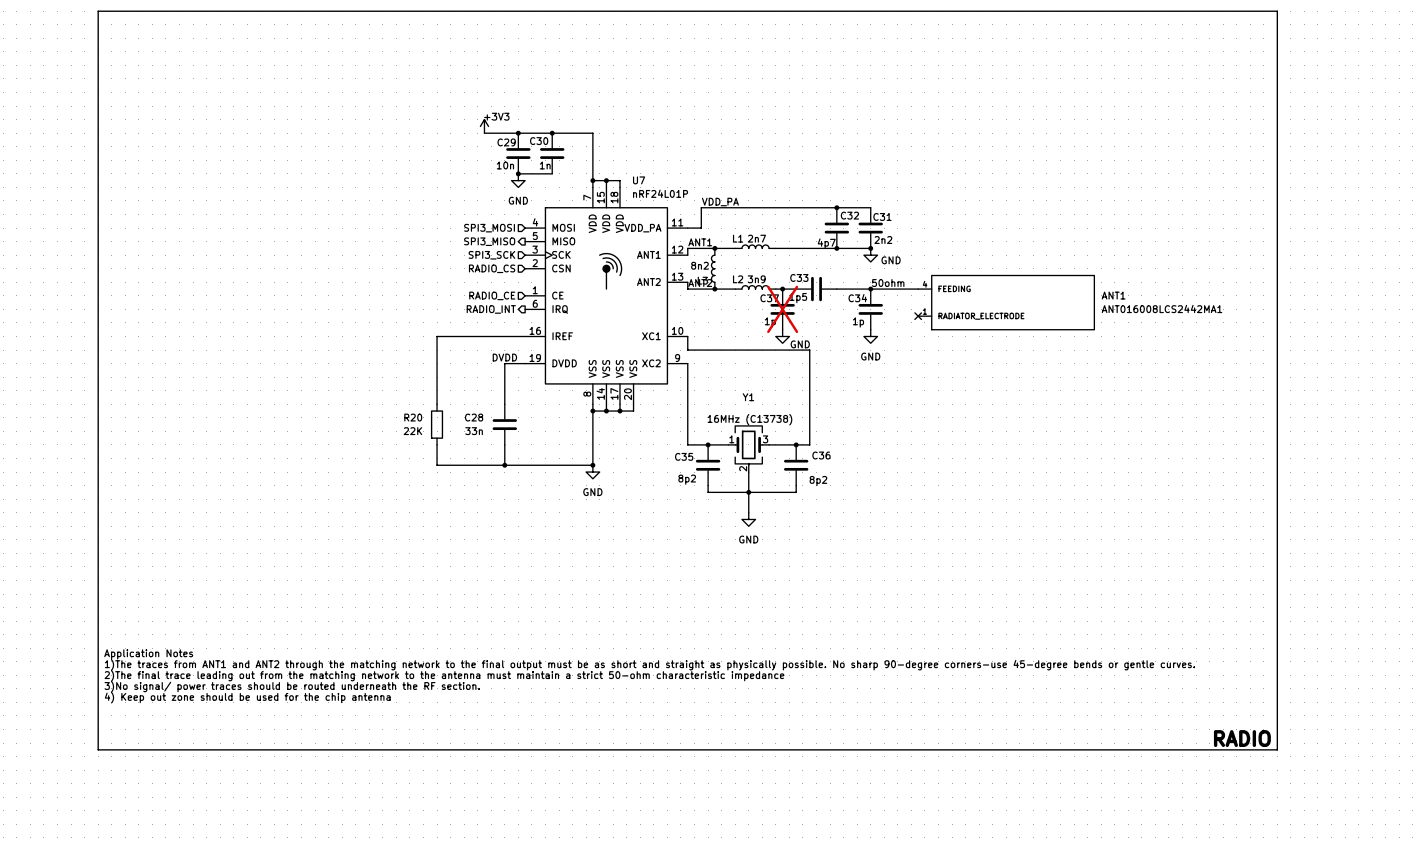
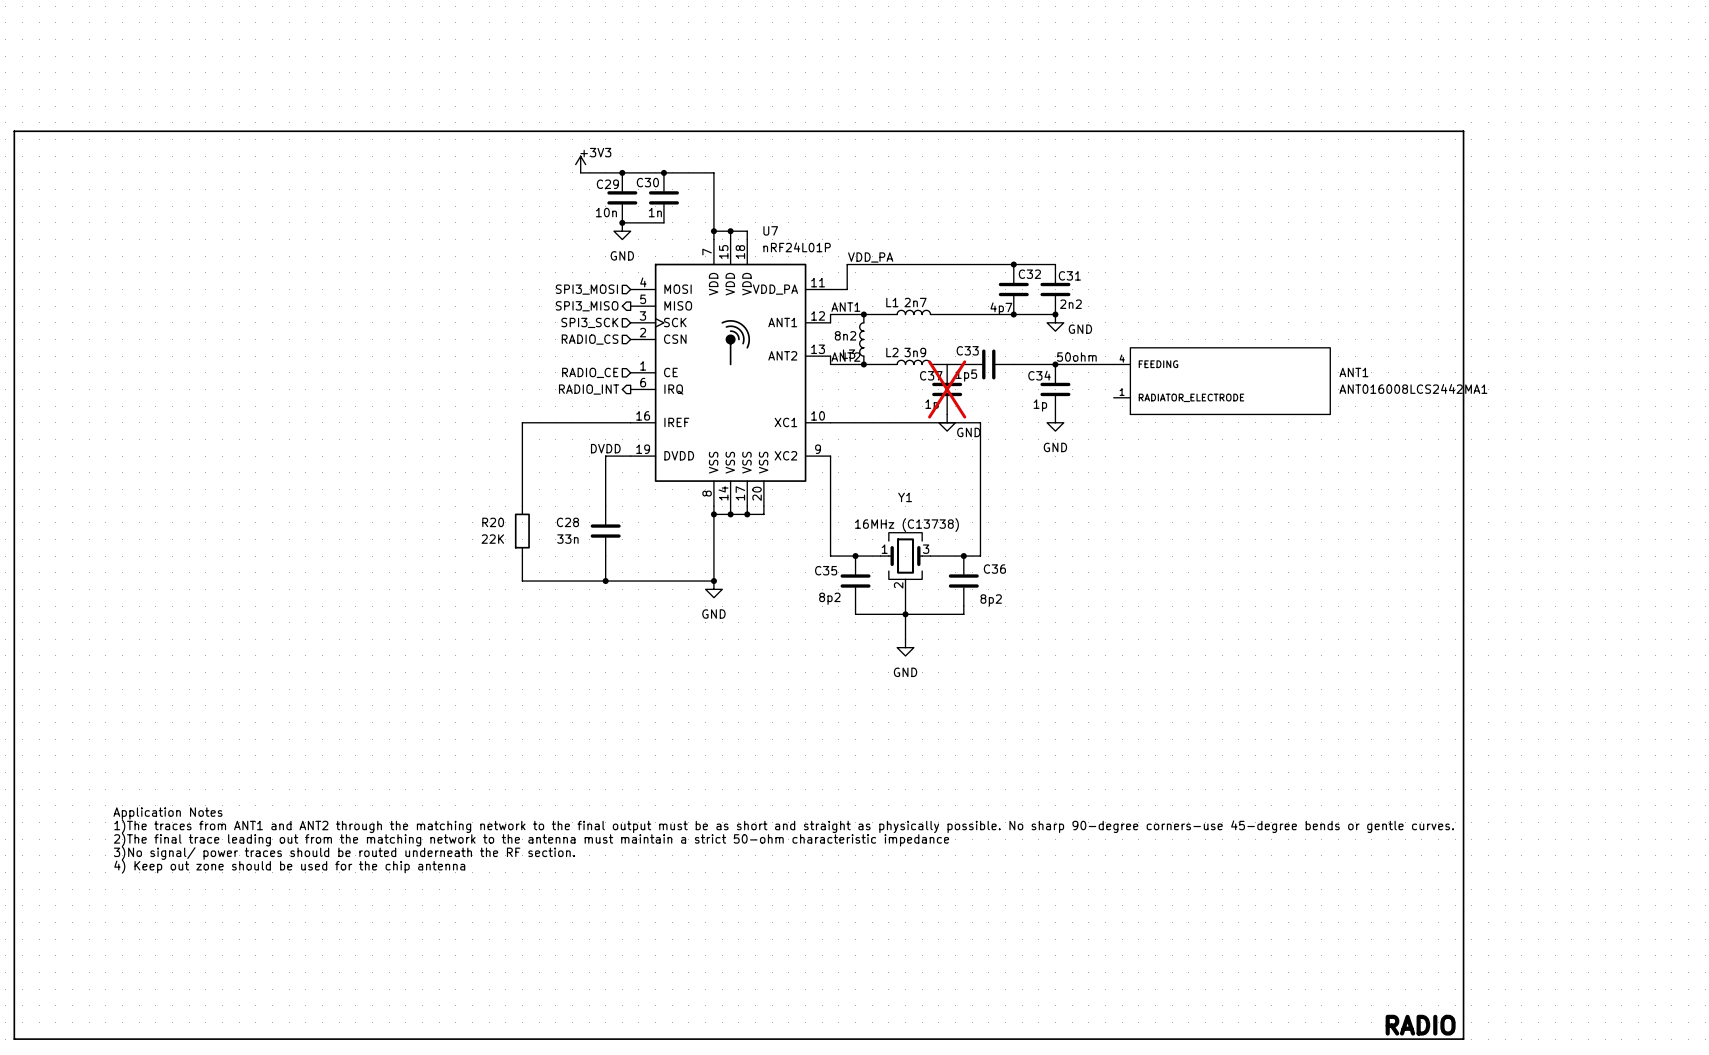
line: (98, 11) (1277, 11) (1277, 749) (98, 749) (98, 11) -> (14, 131) (1463, 131) (1463, 1039) (14, 1039) (14, 131)
junction: (782, 289) -> none
no-connect mark: (918, 316) -> none
wire: (687, 336) (687, 350) (809, 350) -> (830, 422) (980, 422) (980, 439)
text position: RADIO (1242, 738) -> RADIO (1420, 1025)

